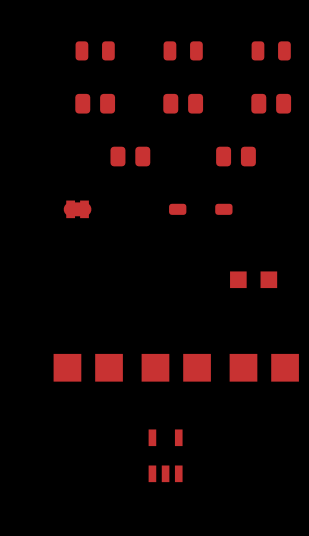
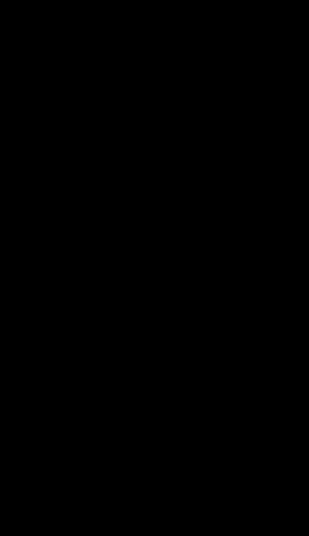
part: (95, 50) -> none
part: (183, 50) -> none
part: (271, 50) -> none
part: (95, 103) -> none
part: (183, 103) -> none
part: (271, 103) -> none
part: (130, 156) -> none
part: (235, 156) -> none
part: (77, 209) -> none
part: (200, 209) -> none
part: (253, 279) -> none
part: (88, 367) -> none
part: (176, 367) -> none
part: (264, 367) -> none
part: (165, 455) -> none

